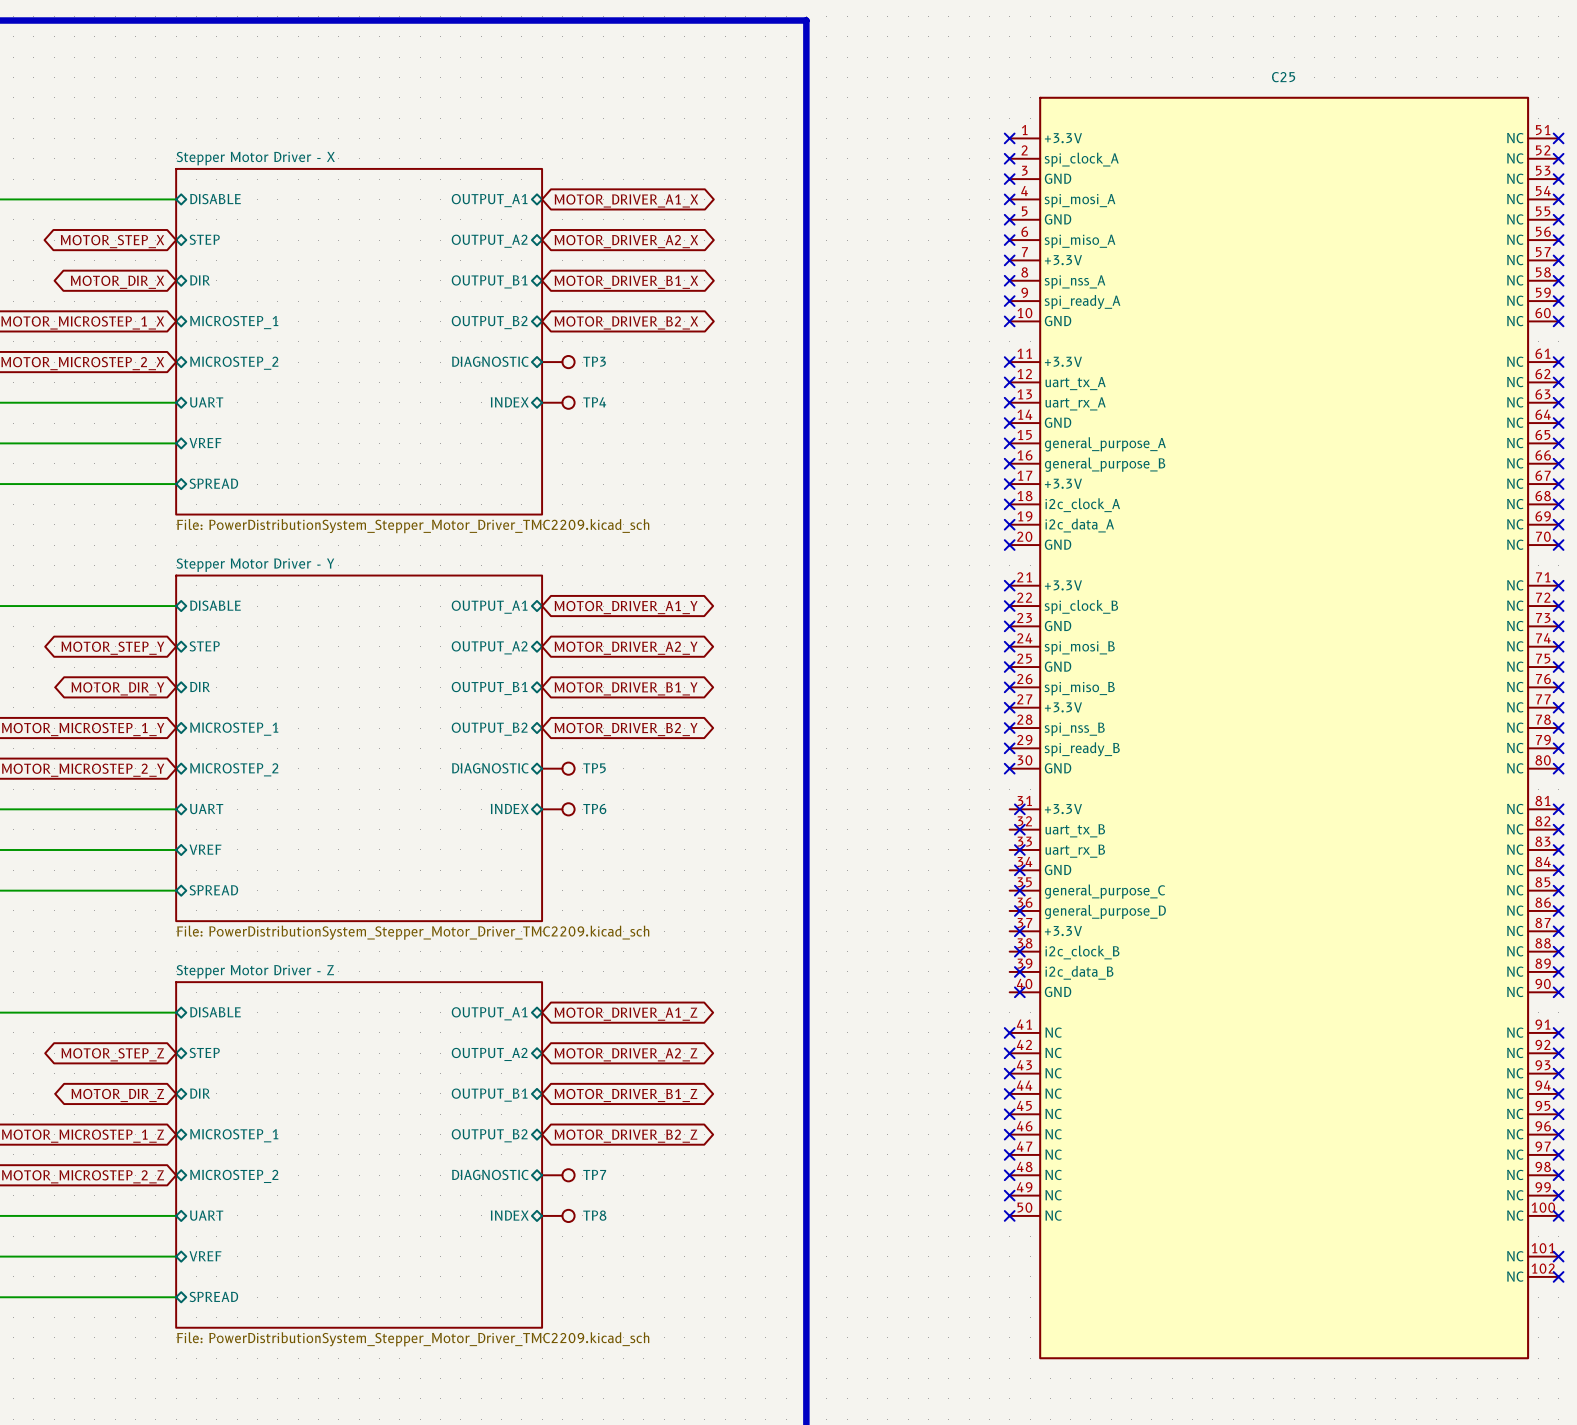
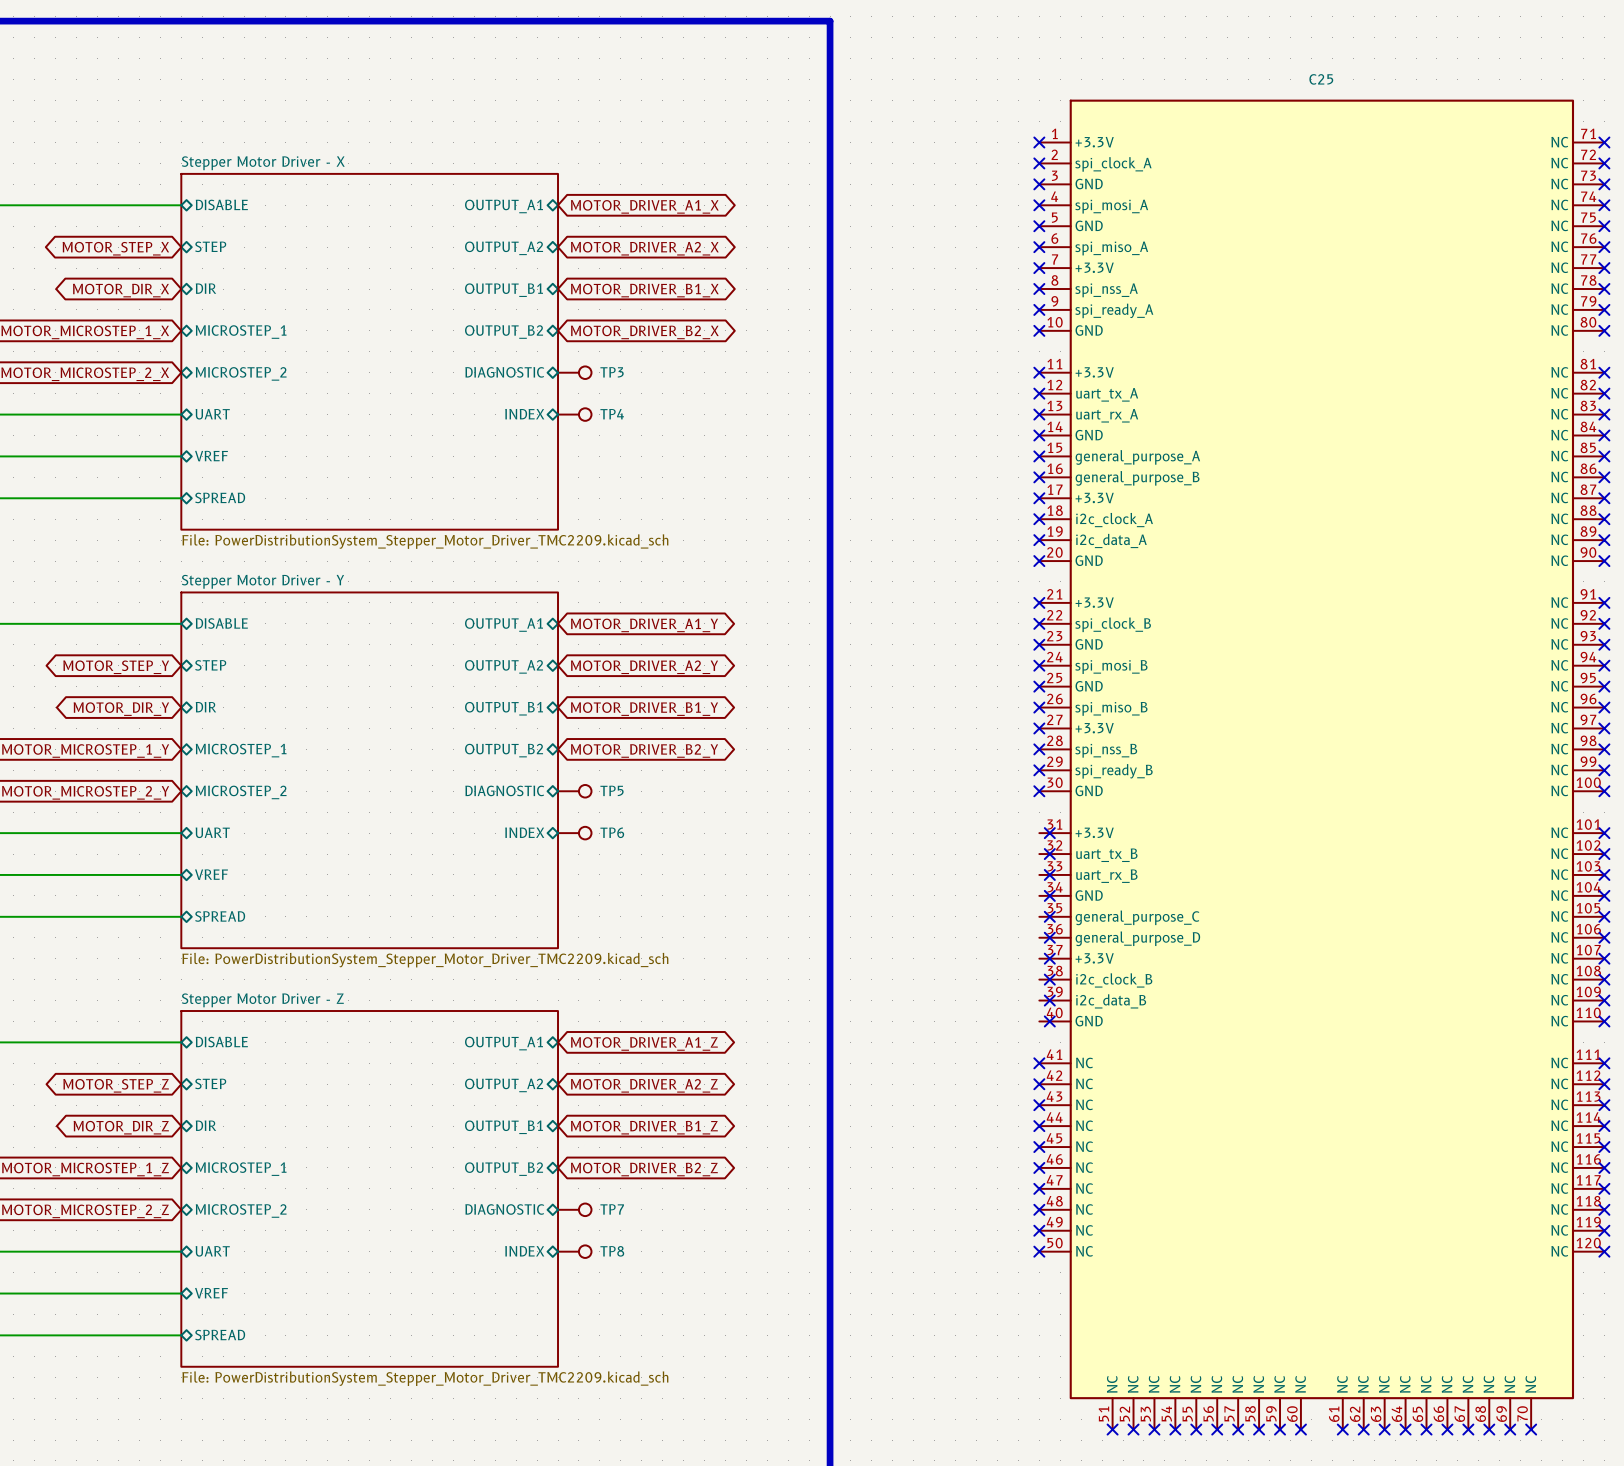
C25 symbol: [1009, 96, 1559, 1360] -> [1039, 99, 1605, 1430]
no-connect mark: (1558, 1256) -> none
no-connect mark: (1558, 1276) -> none
no-connect mark: none -> (1112, 1429)
no-connect mark: none -> (1133, 1429)
no-connect mark: none -> (1154, 1429)
no-connect mark: none -> (1175, 1429)
no-connect mark: none -> (1196, 1429)
no-connect mark: none -> (1217, 1429)
no-connect mark: none -> (1238, 1429)
no-connect mark: none -> (1259, 1429)
no-connect mark: none -> (1280, 1429)
no-connect mark: none -> (1300, 1429)
no-connect mark: none -> (1342, 1429)
no-connect mark: none -> (1363, 1429)
no-connect mark: none -> (1384, 1429)
no-connect mark: none -> (1405, 1429)
no-connect mark: none -> (1426, 1429)
no-connect mark: none -> (1447, 1429)
no-connect mark: none -> (1468, 1429)
no-connect mark: none -> (1489, 1429)
no-connect mark: none -> (1510, 1429)
no-connect mark: none -> (1531, 1429)

